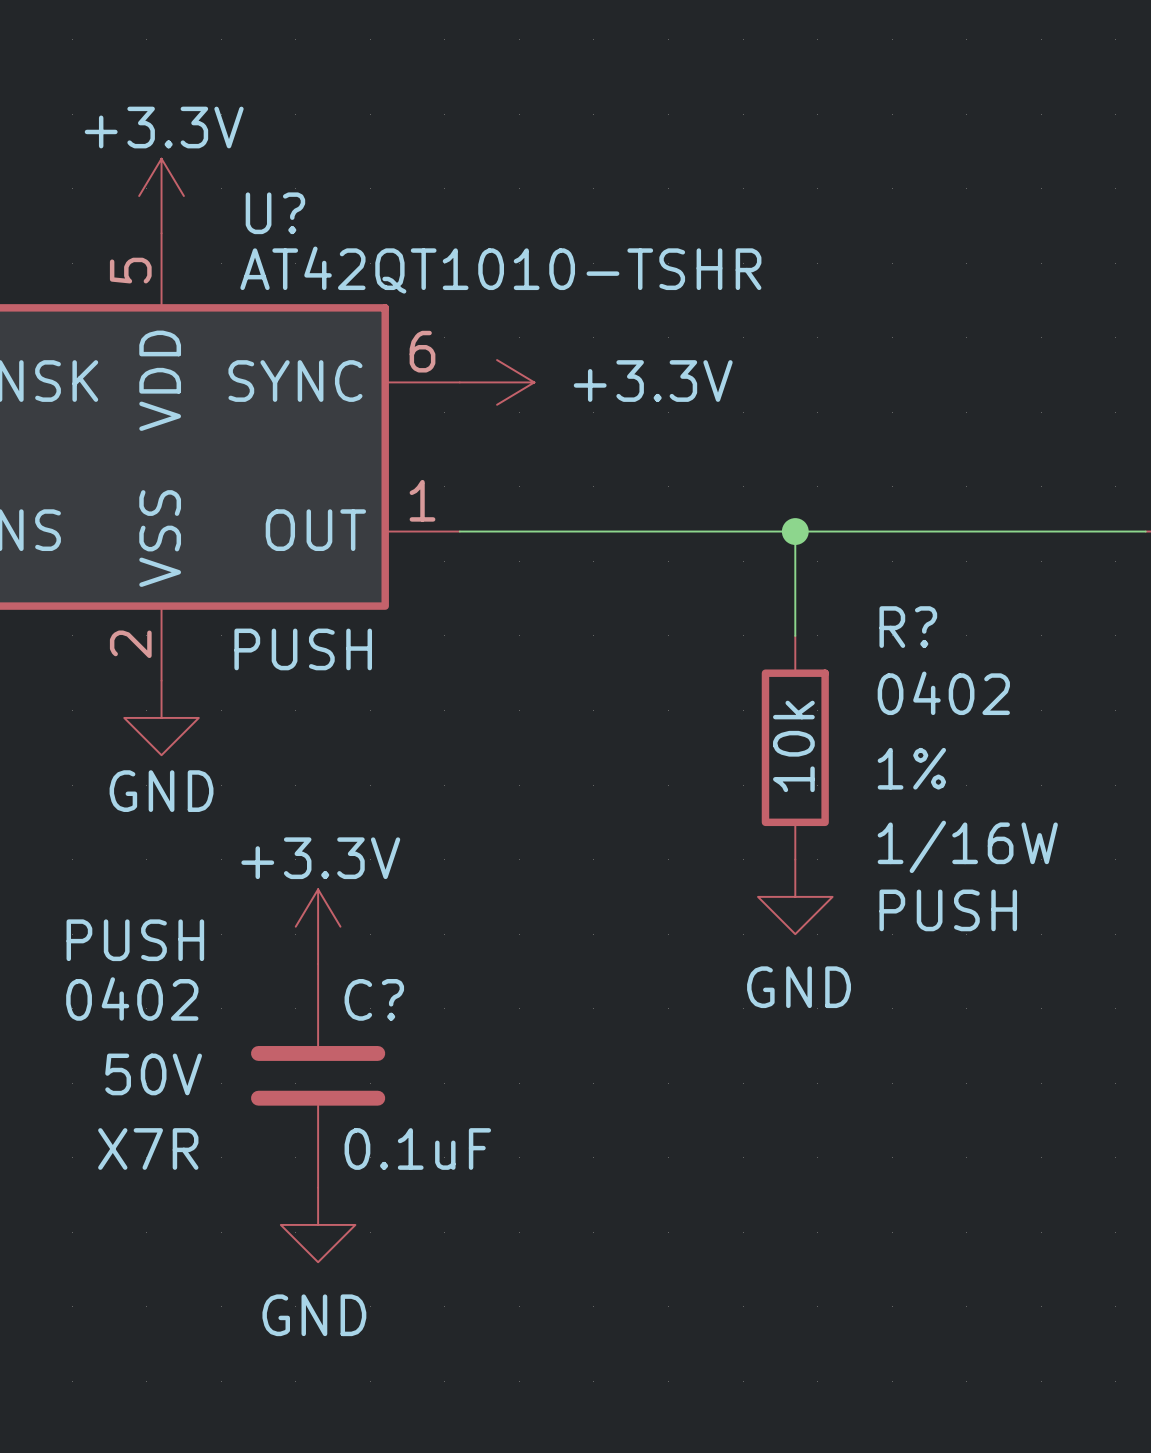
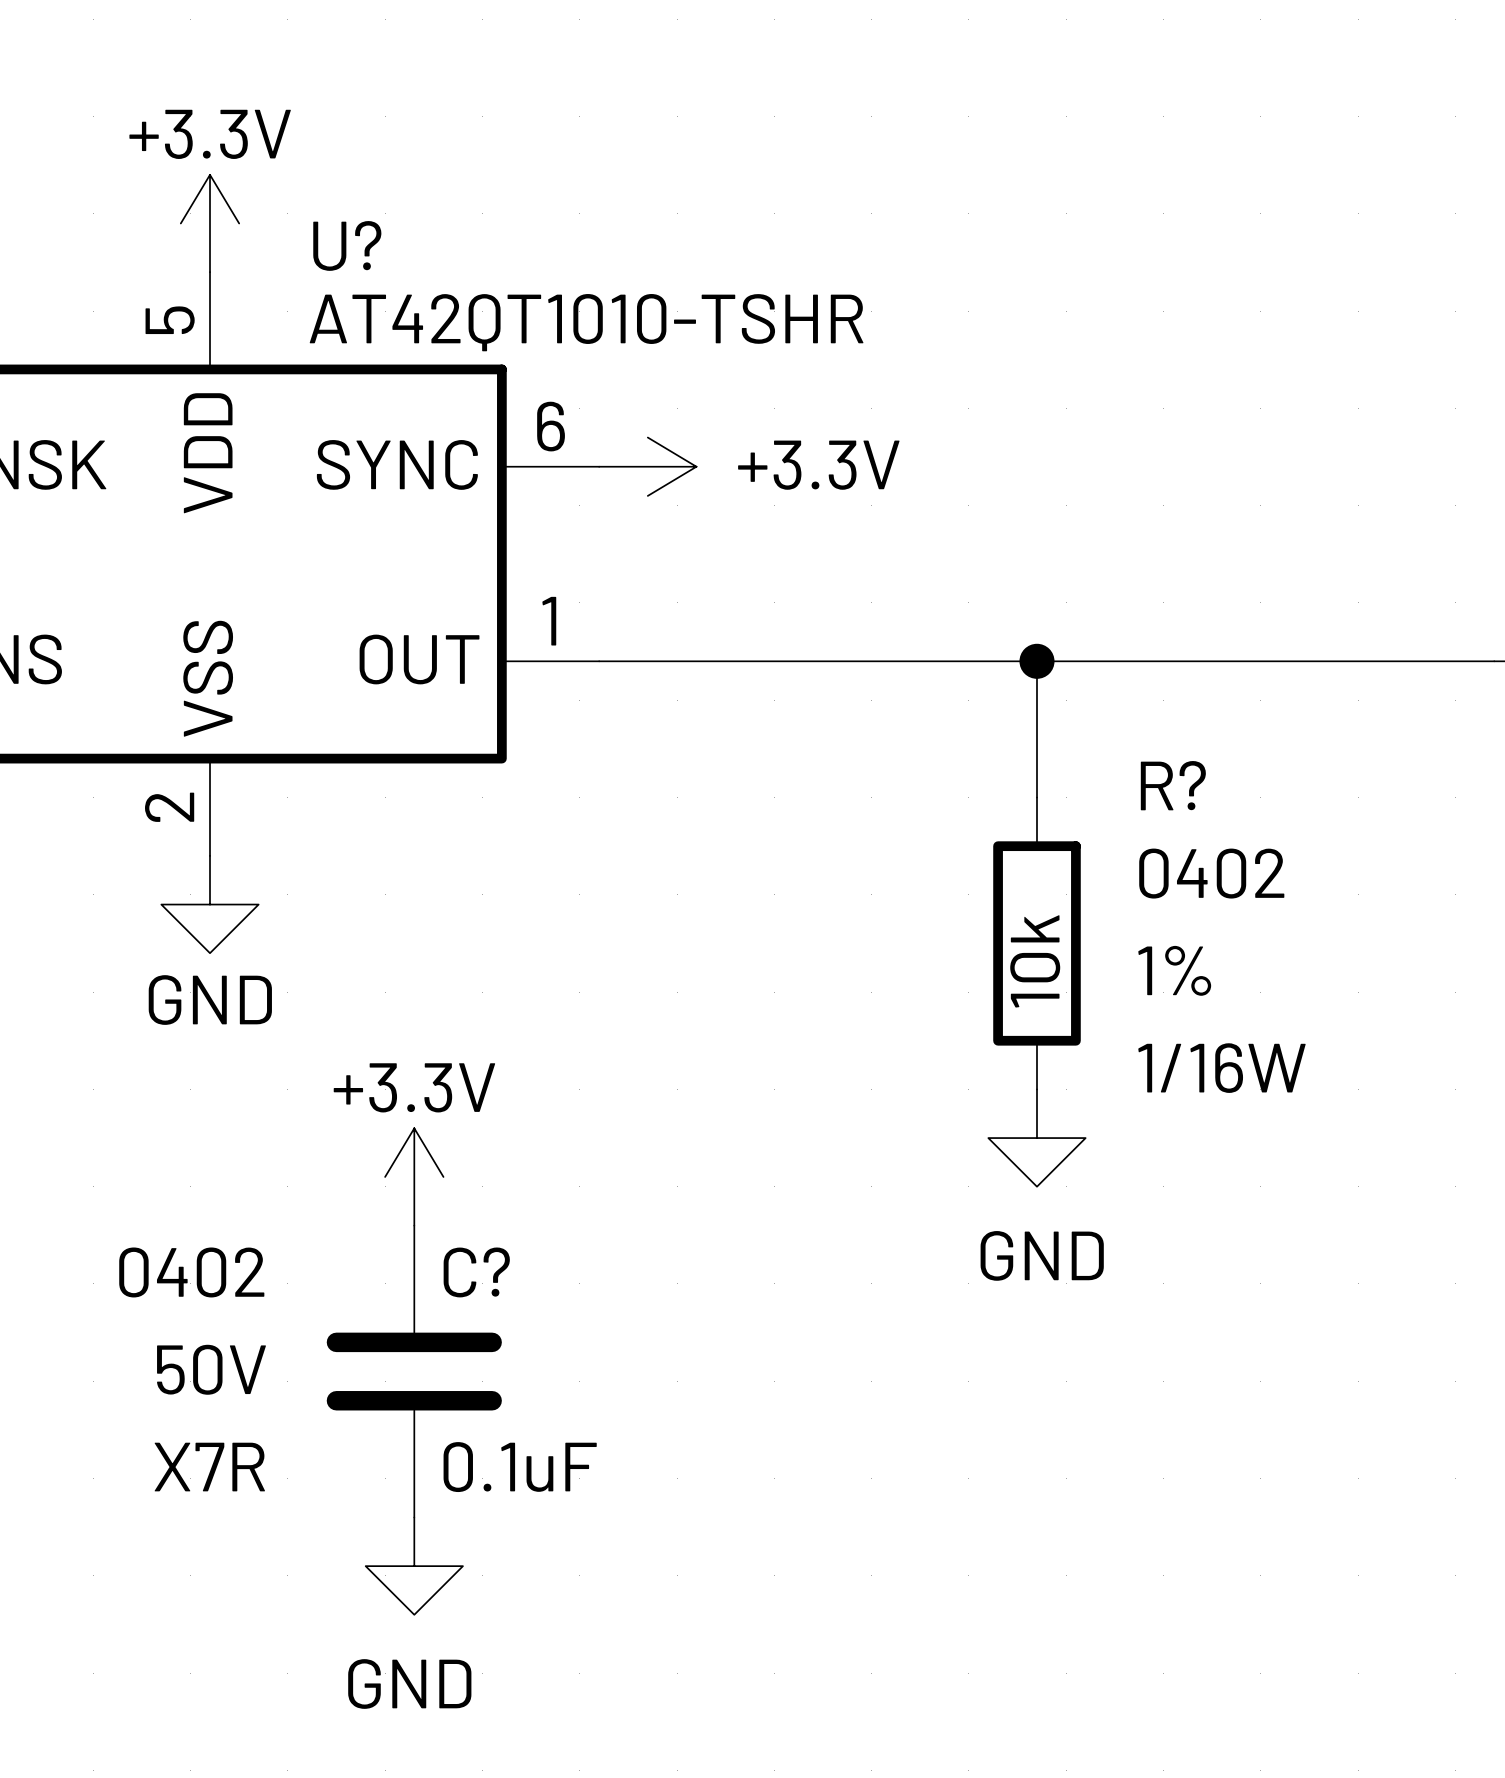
U? text: PUSH (303, 649) -> none
R? text: PUSH (948, 910) -> none
C? text: PUSH (135, 940) -> none

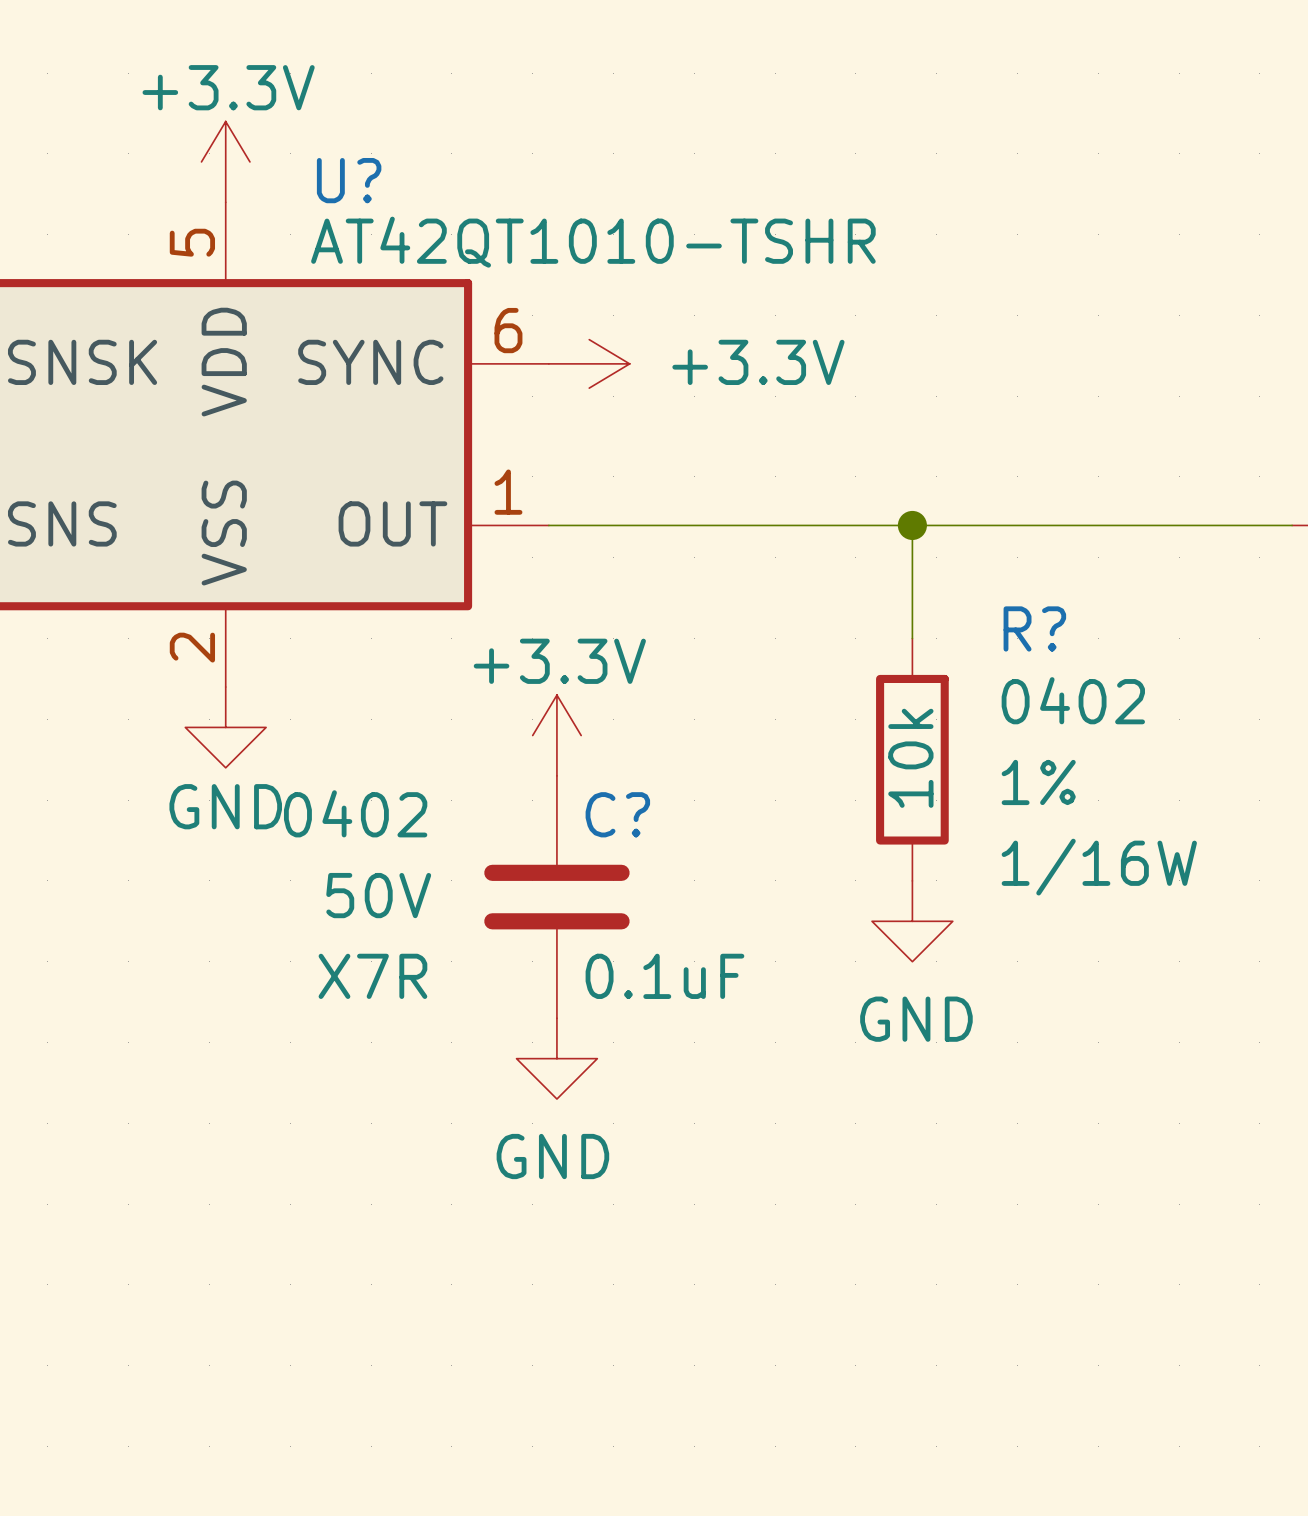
power symbol position: +3.3V (414, 1176) -> +3.3V (556, 735)
C? position: (414, 1371) -> (556, 897)
power symbol position: GND (414, 1566) -> GND (556, 1058)

